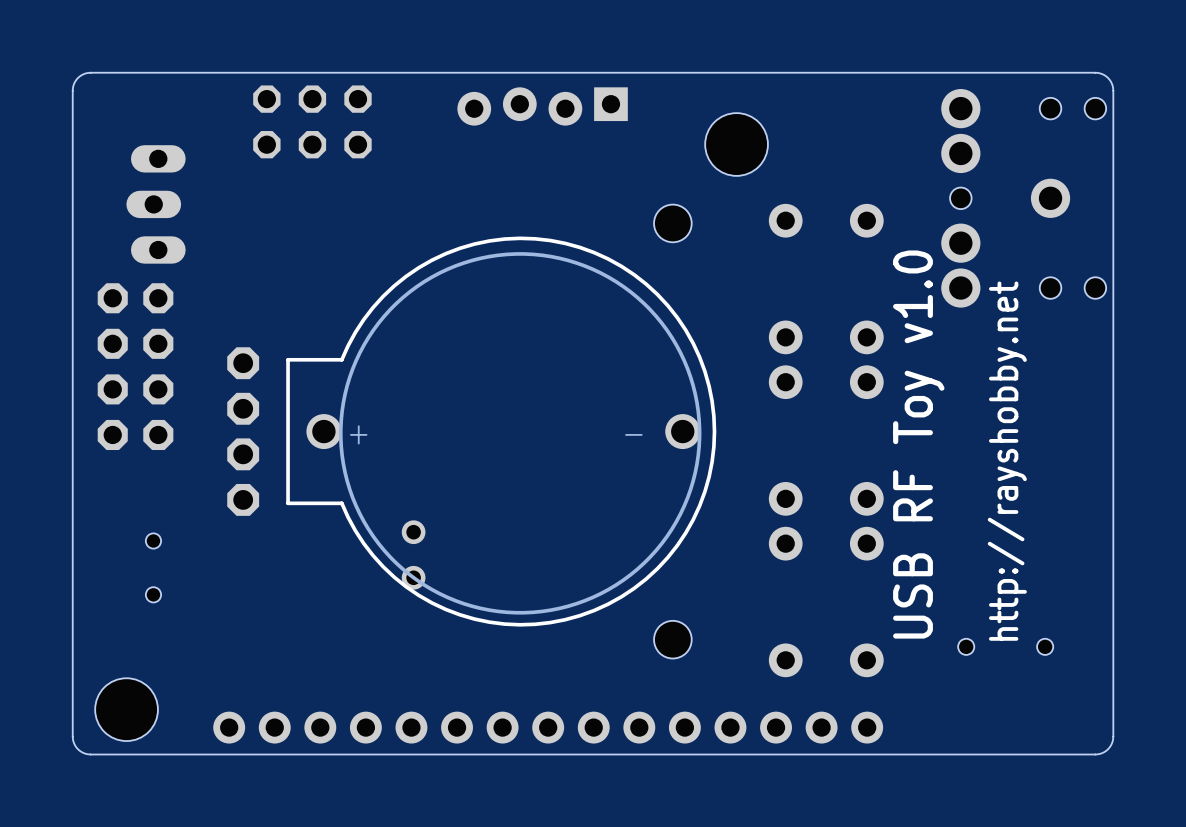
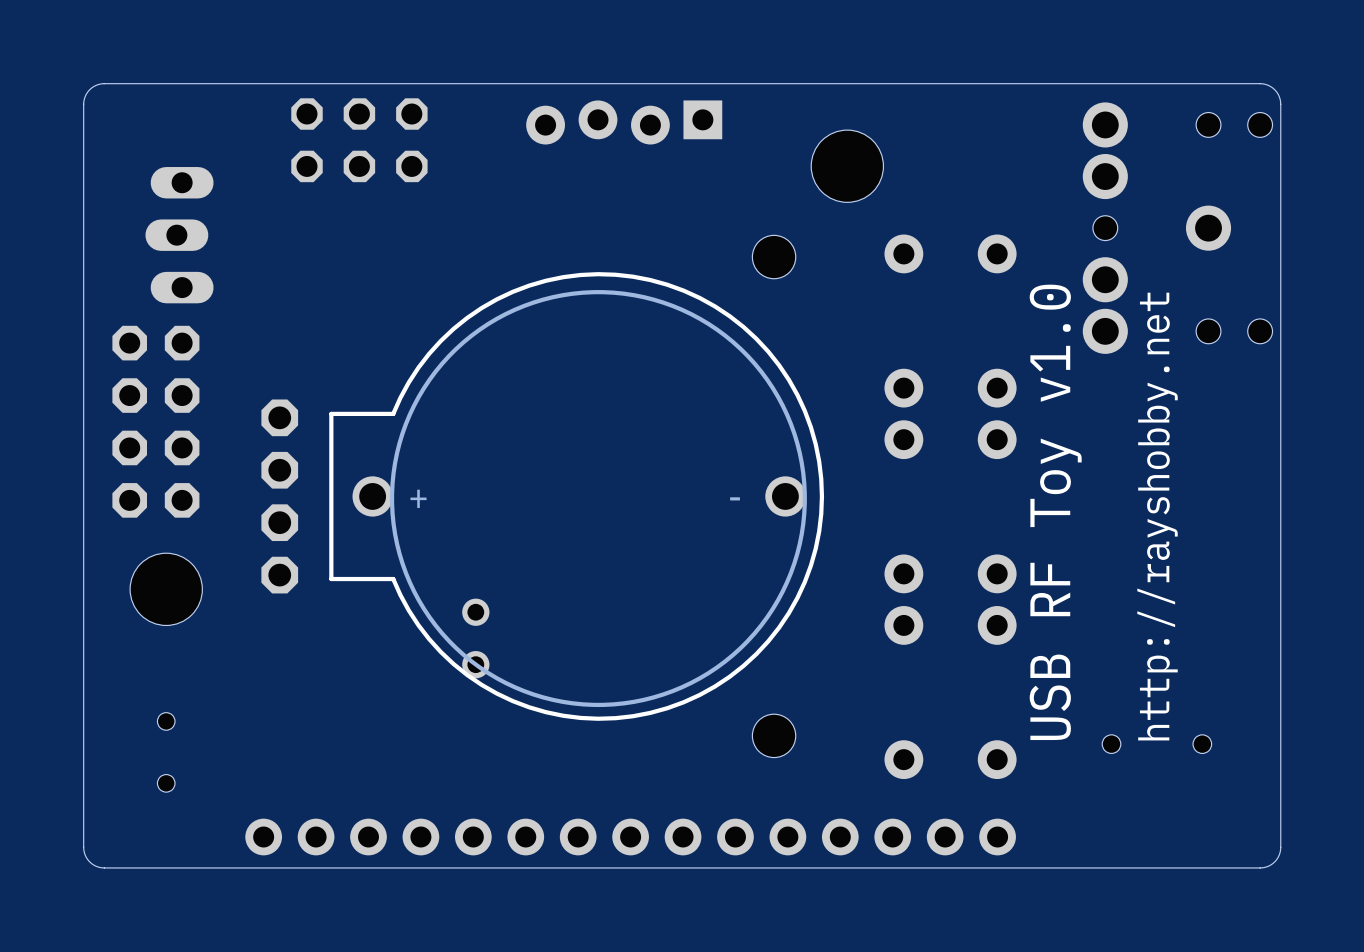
part position: (153, 567) -> (166, 752)
hole position: (126, 709) -> (166, 589)

